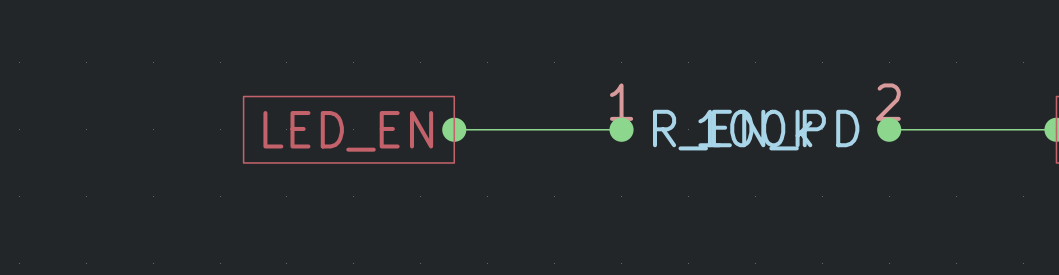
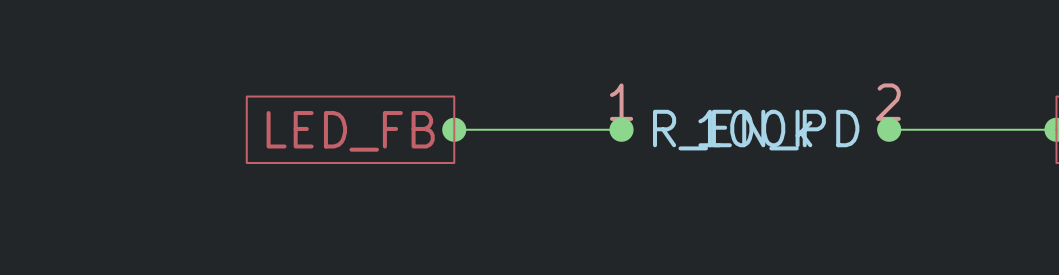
global label: LED_EN (348, 131) -> LED_FB (350, 131)

